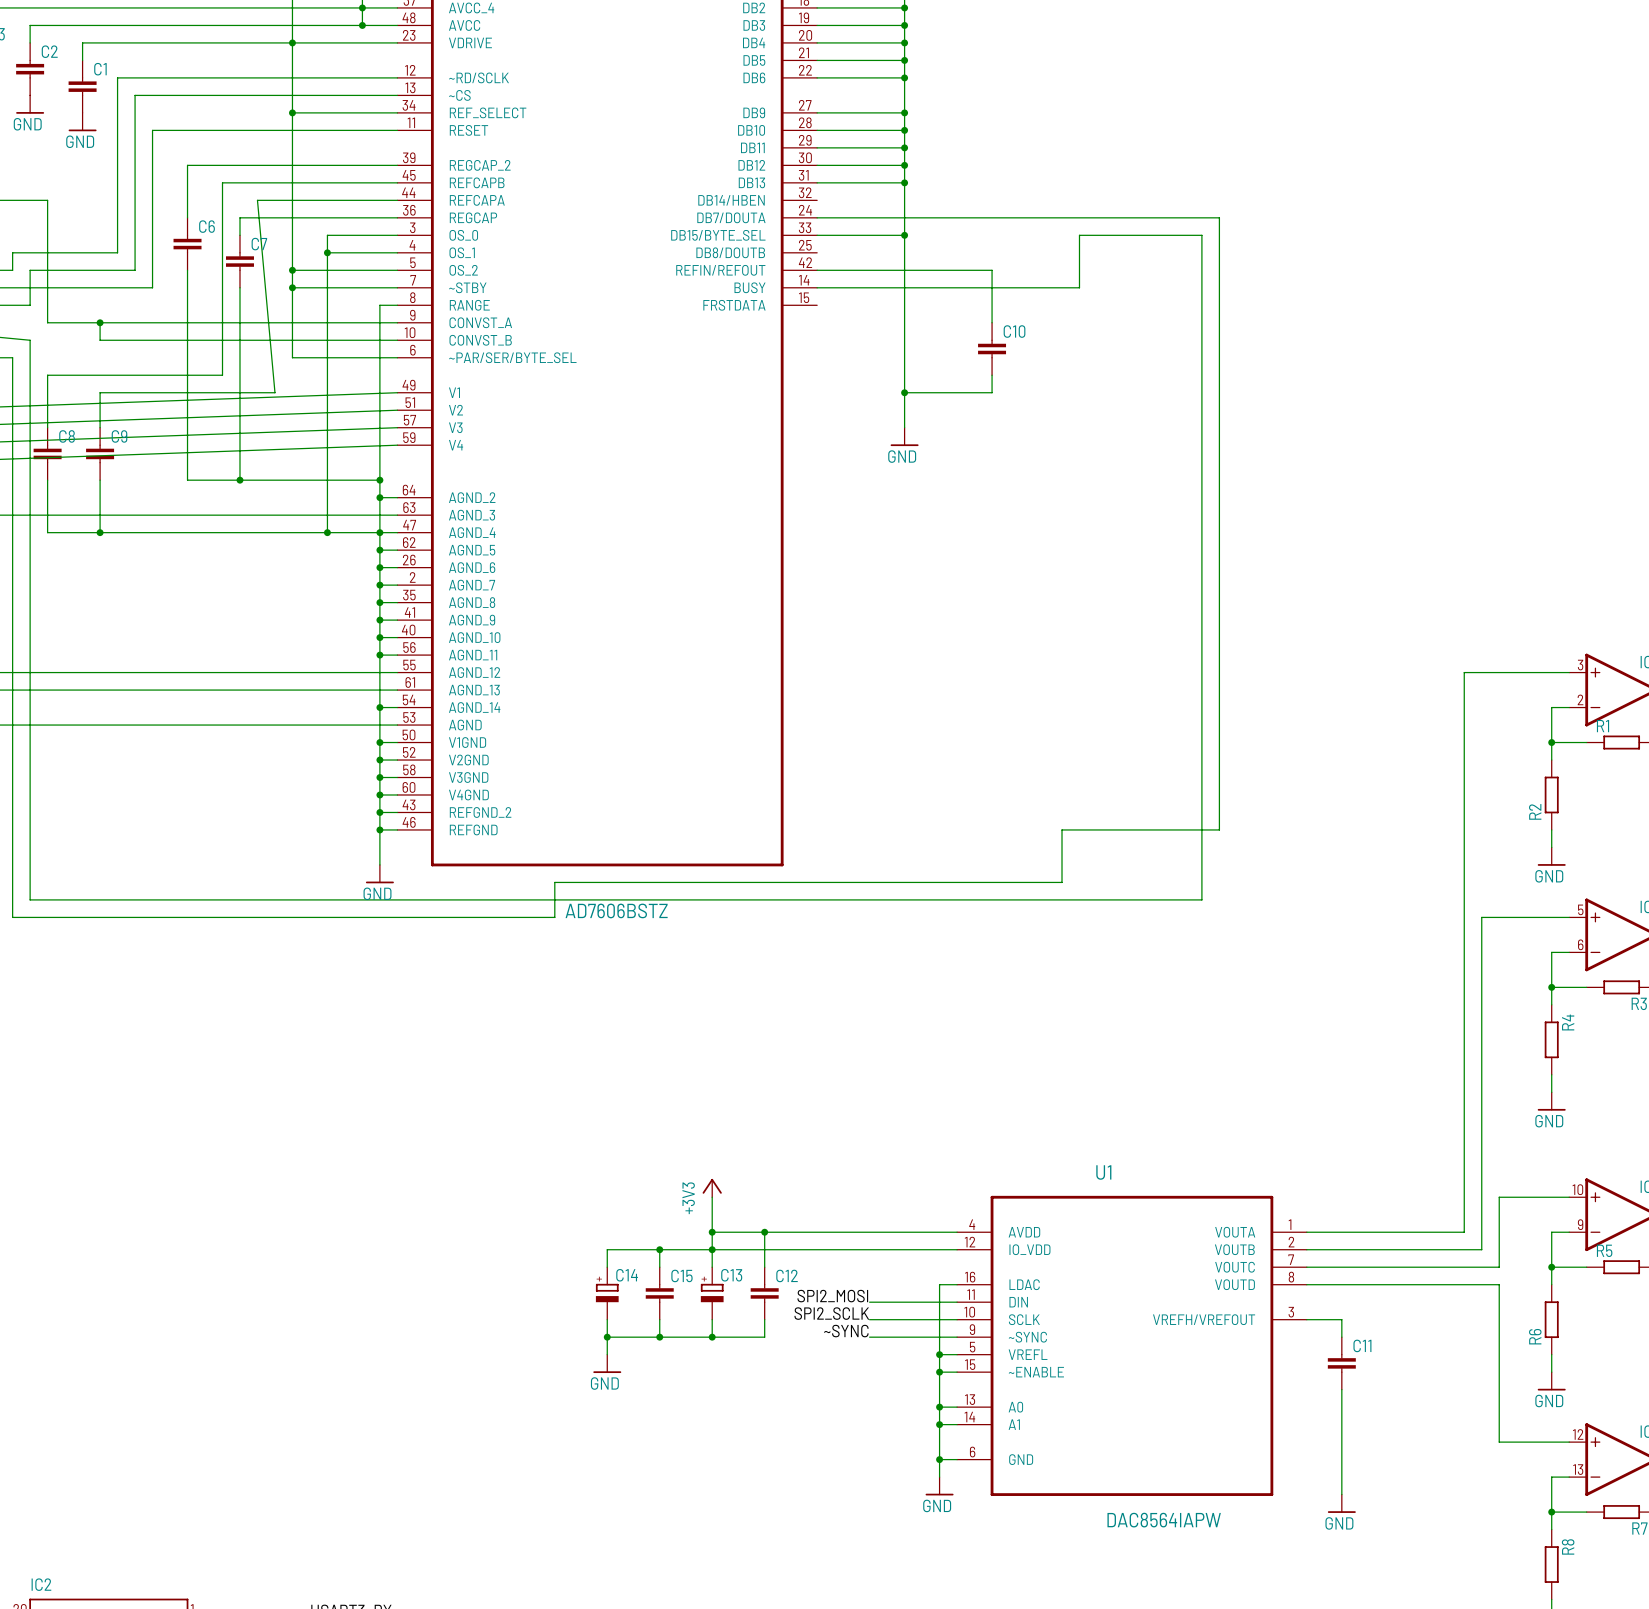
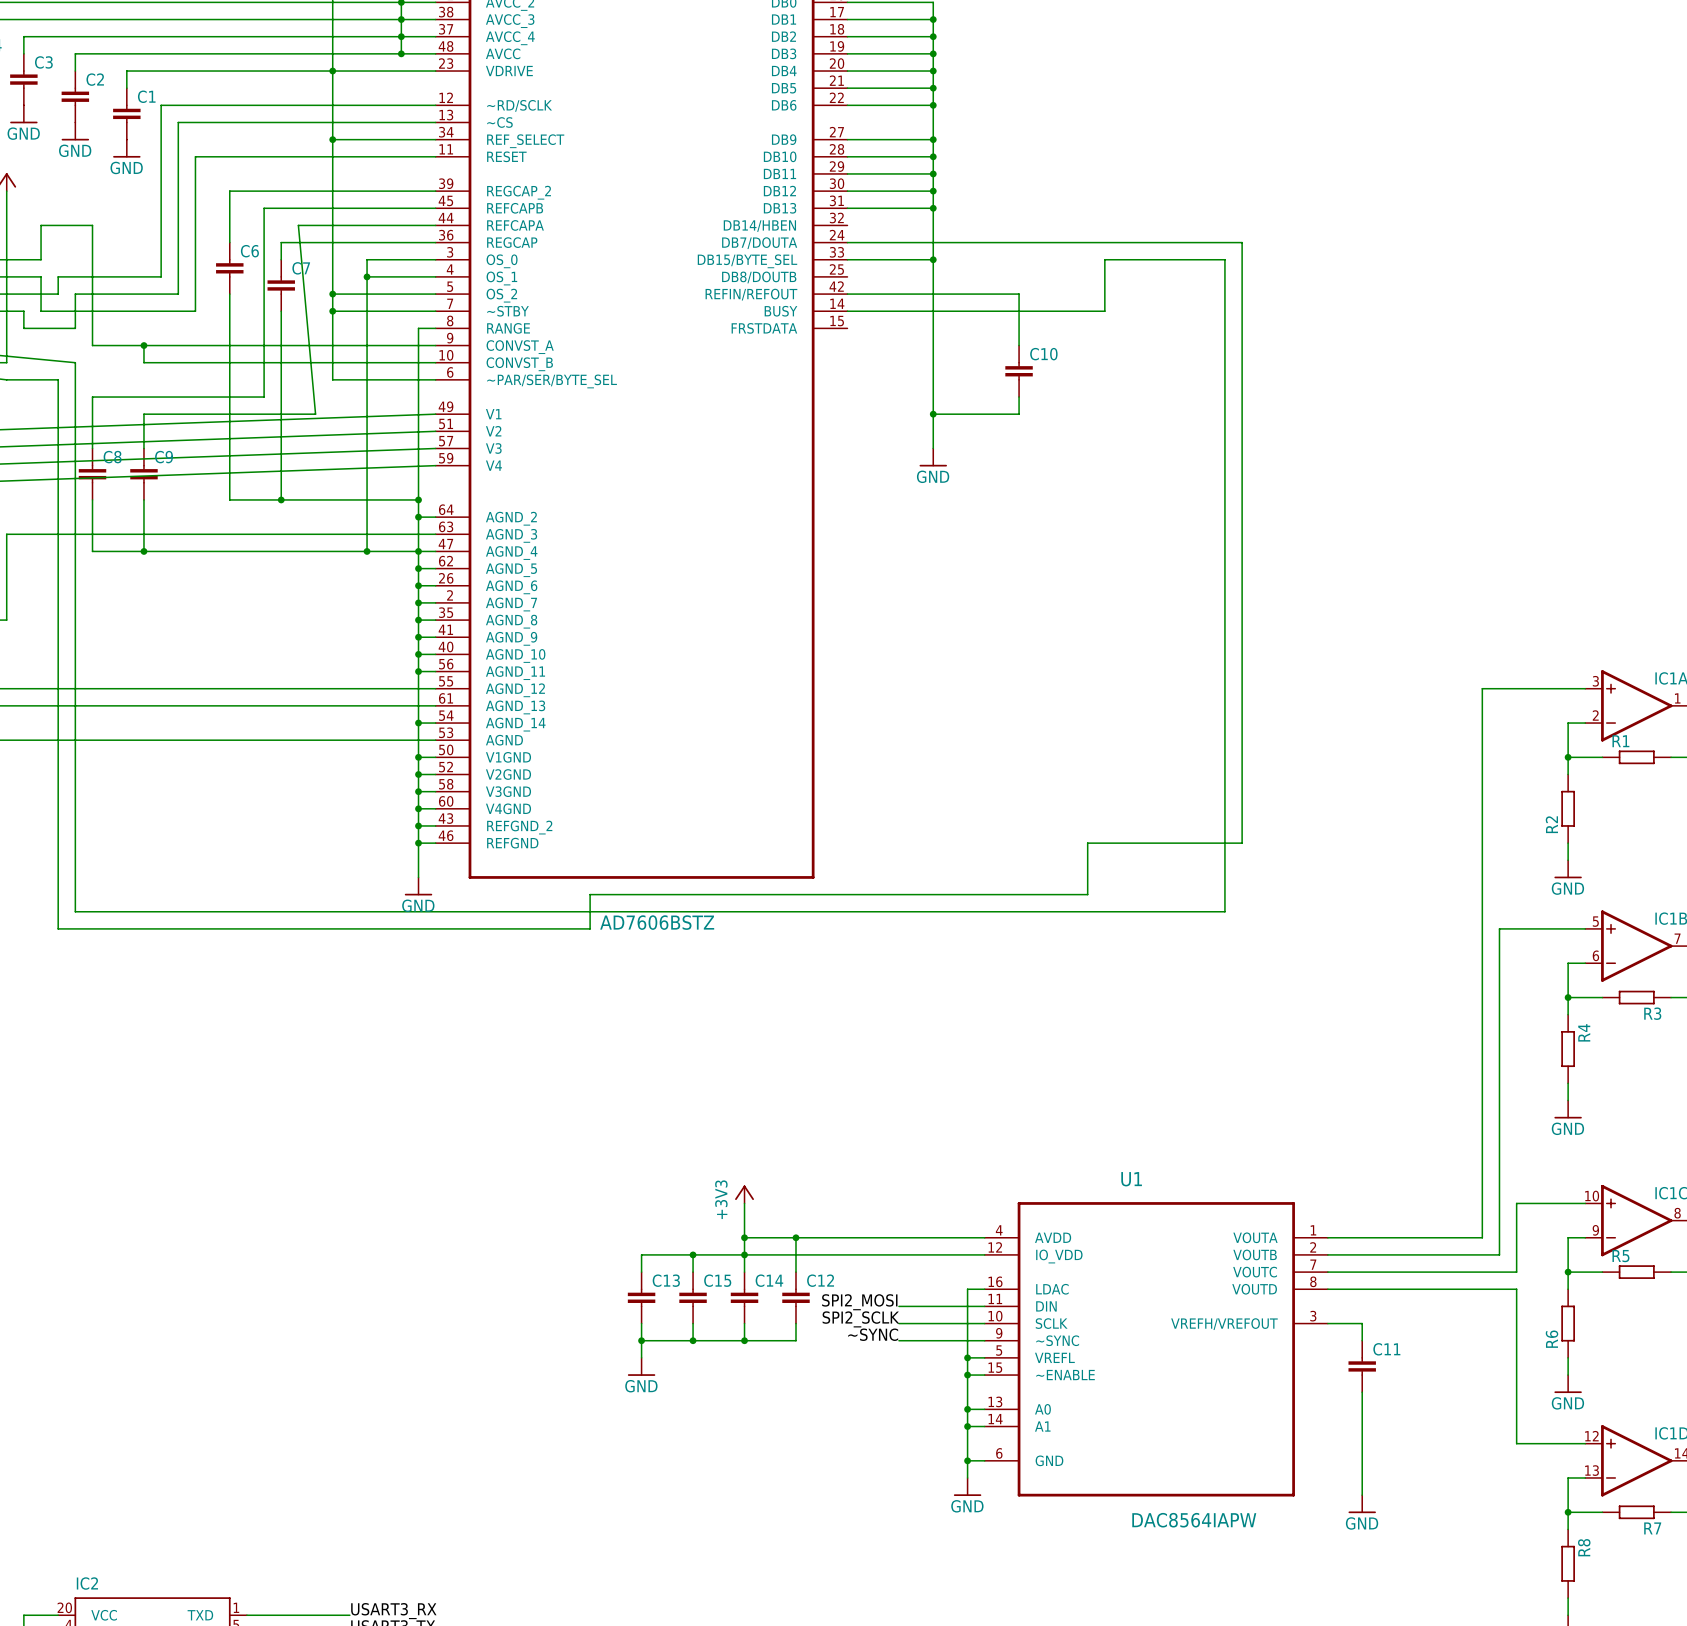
C14 symbol: [595, 1267, 619, 1320] -> [730, 1272, 759, 1324]
C13 symbol: [700, 1267, 724, 1320] -> [627, 1272, 656, 1324]

